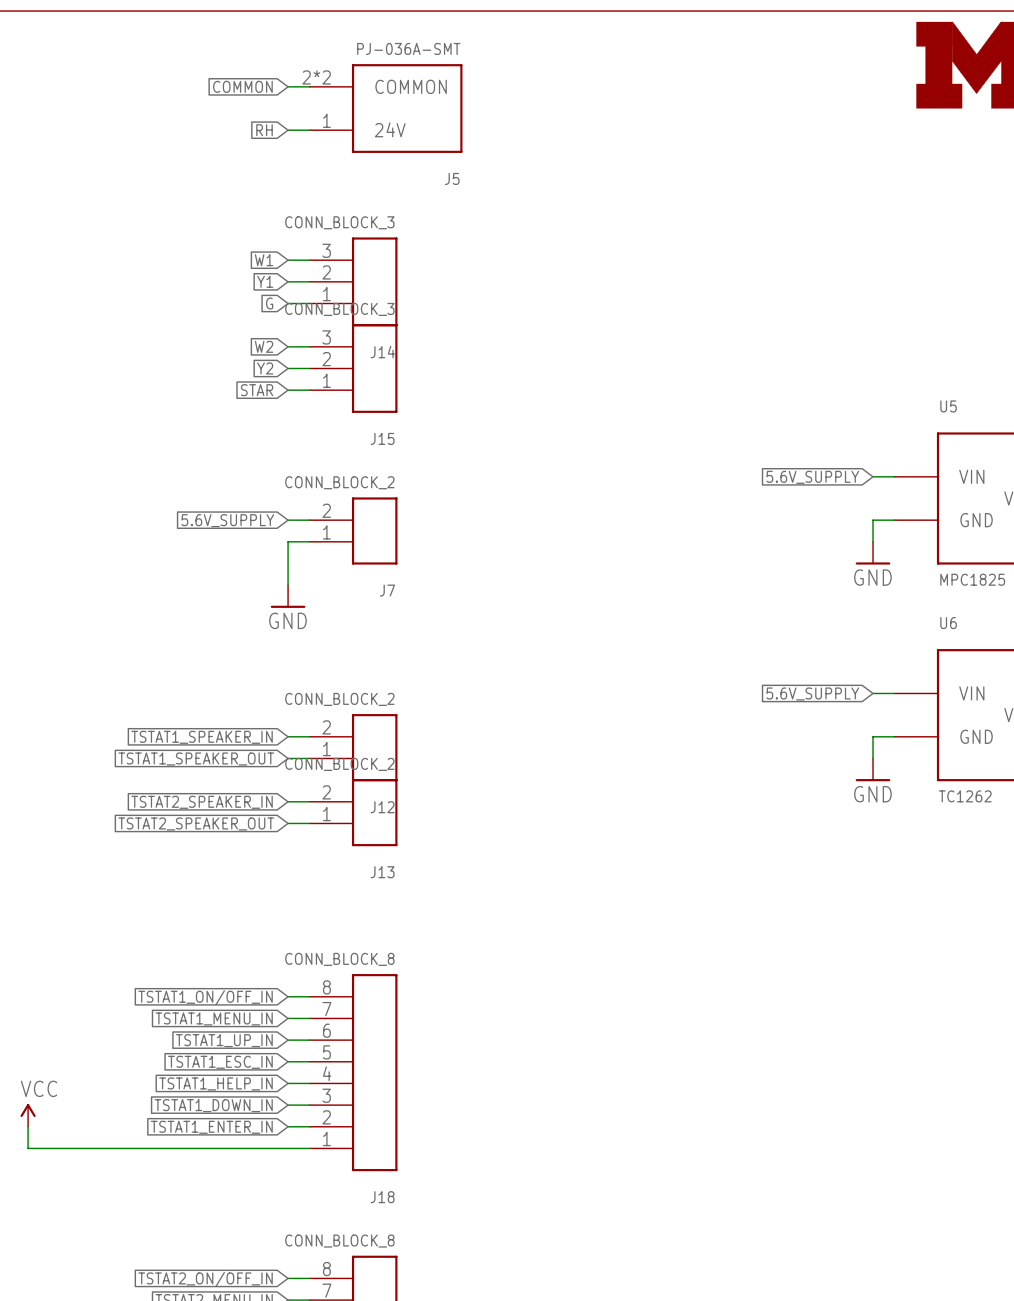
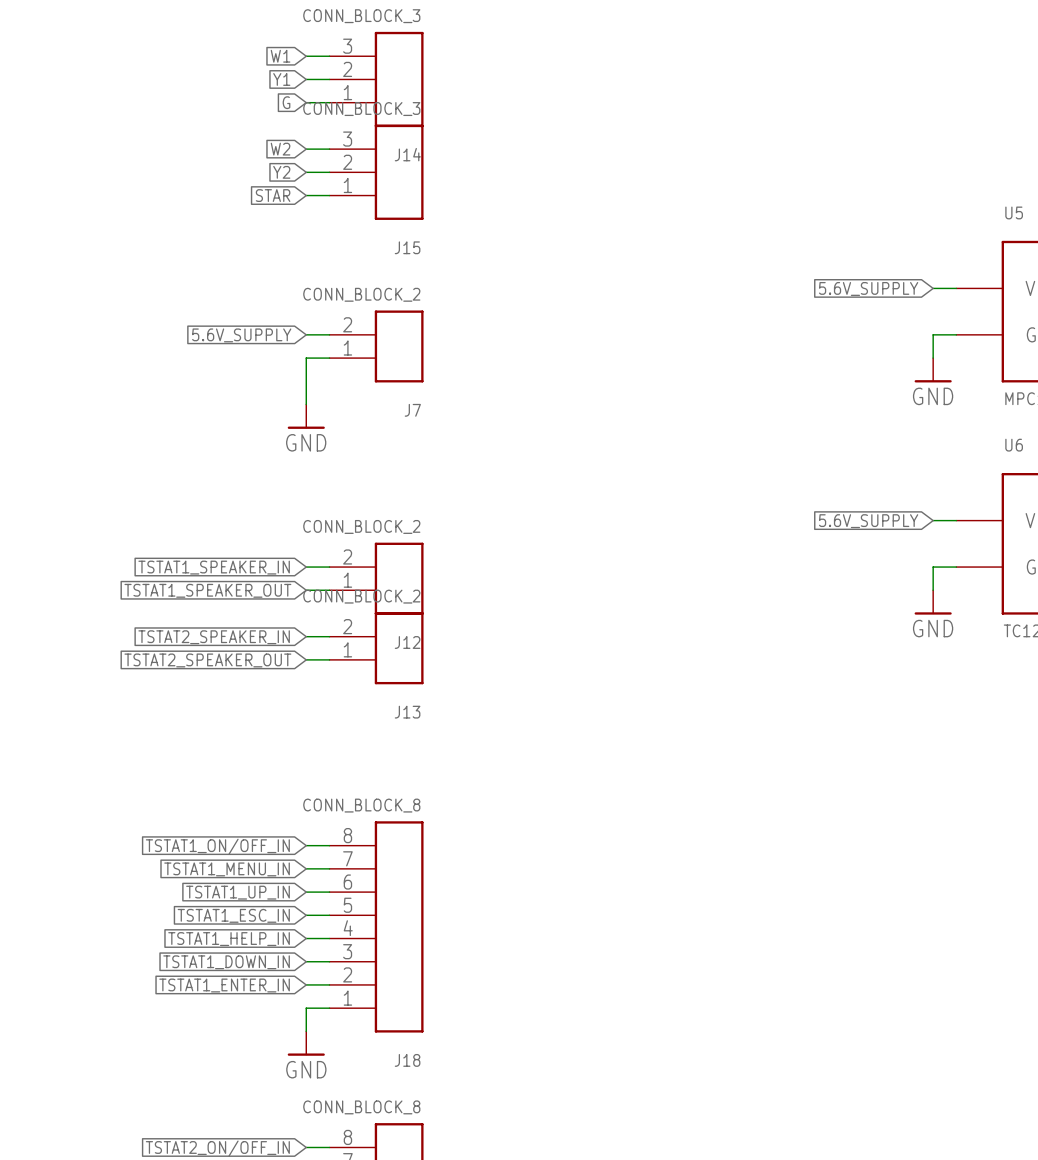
power symbol: VCC (28, 1115) -> none
wire: (28, 1126) (28, 1148) (288, 1148) -> (306, 1031) (306, 1008)
power symbol: none -> GND (306, 1043)

